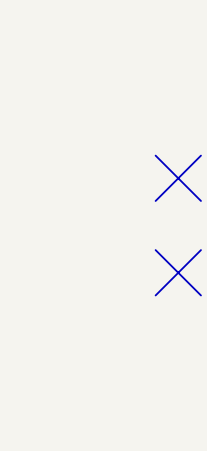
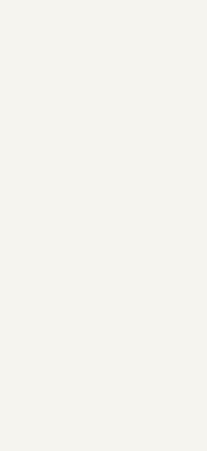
no-connect mark: (178, 178) -> none
no-connect mark: (178, 272) -> none

